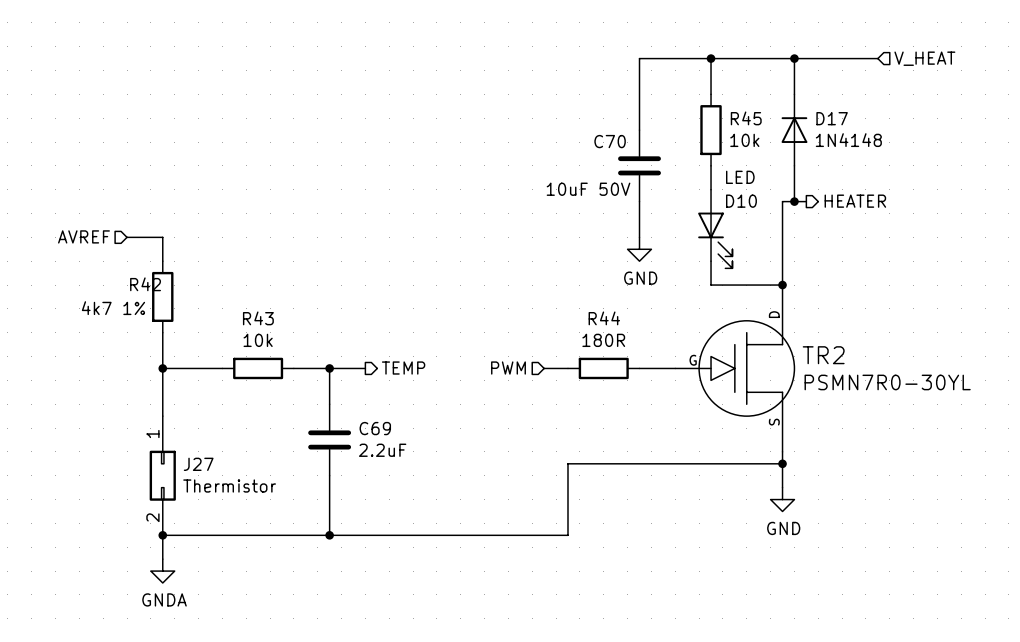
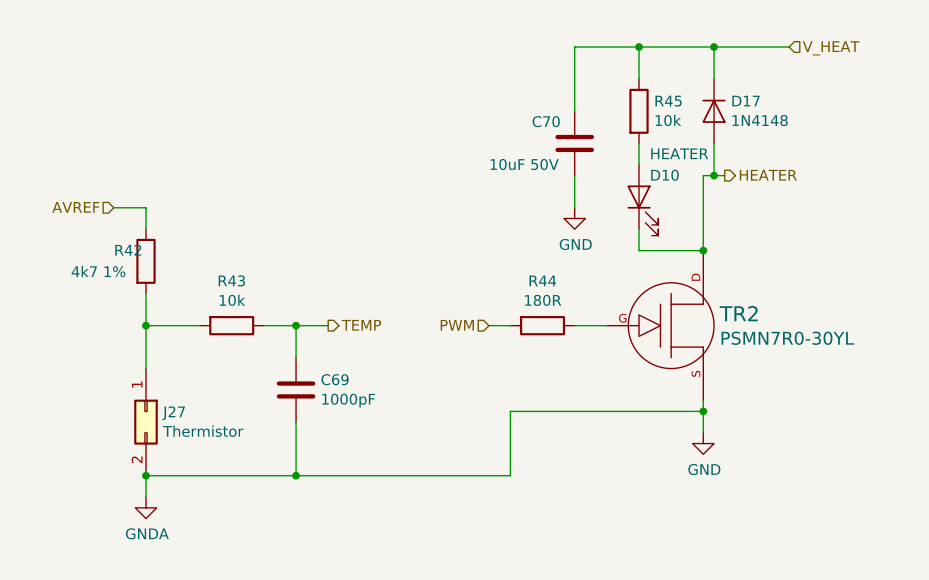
D10 value: LED (740, 177) -> HEATER (679, 153)
C69 value: 2.2uF (382, 450) -> 1000pF (348, 400)

